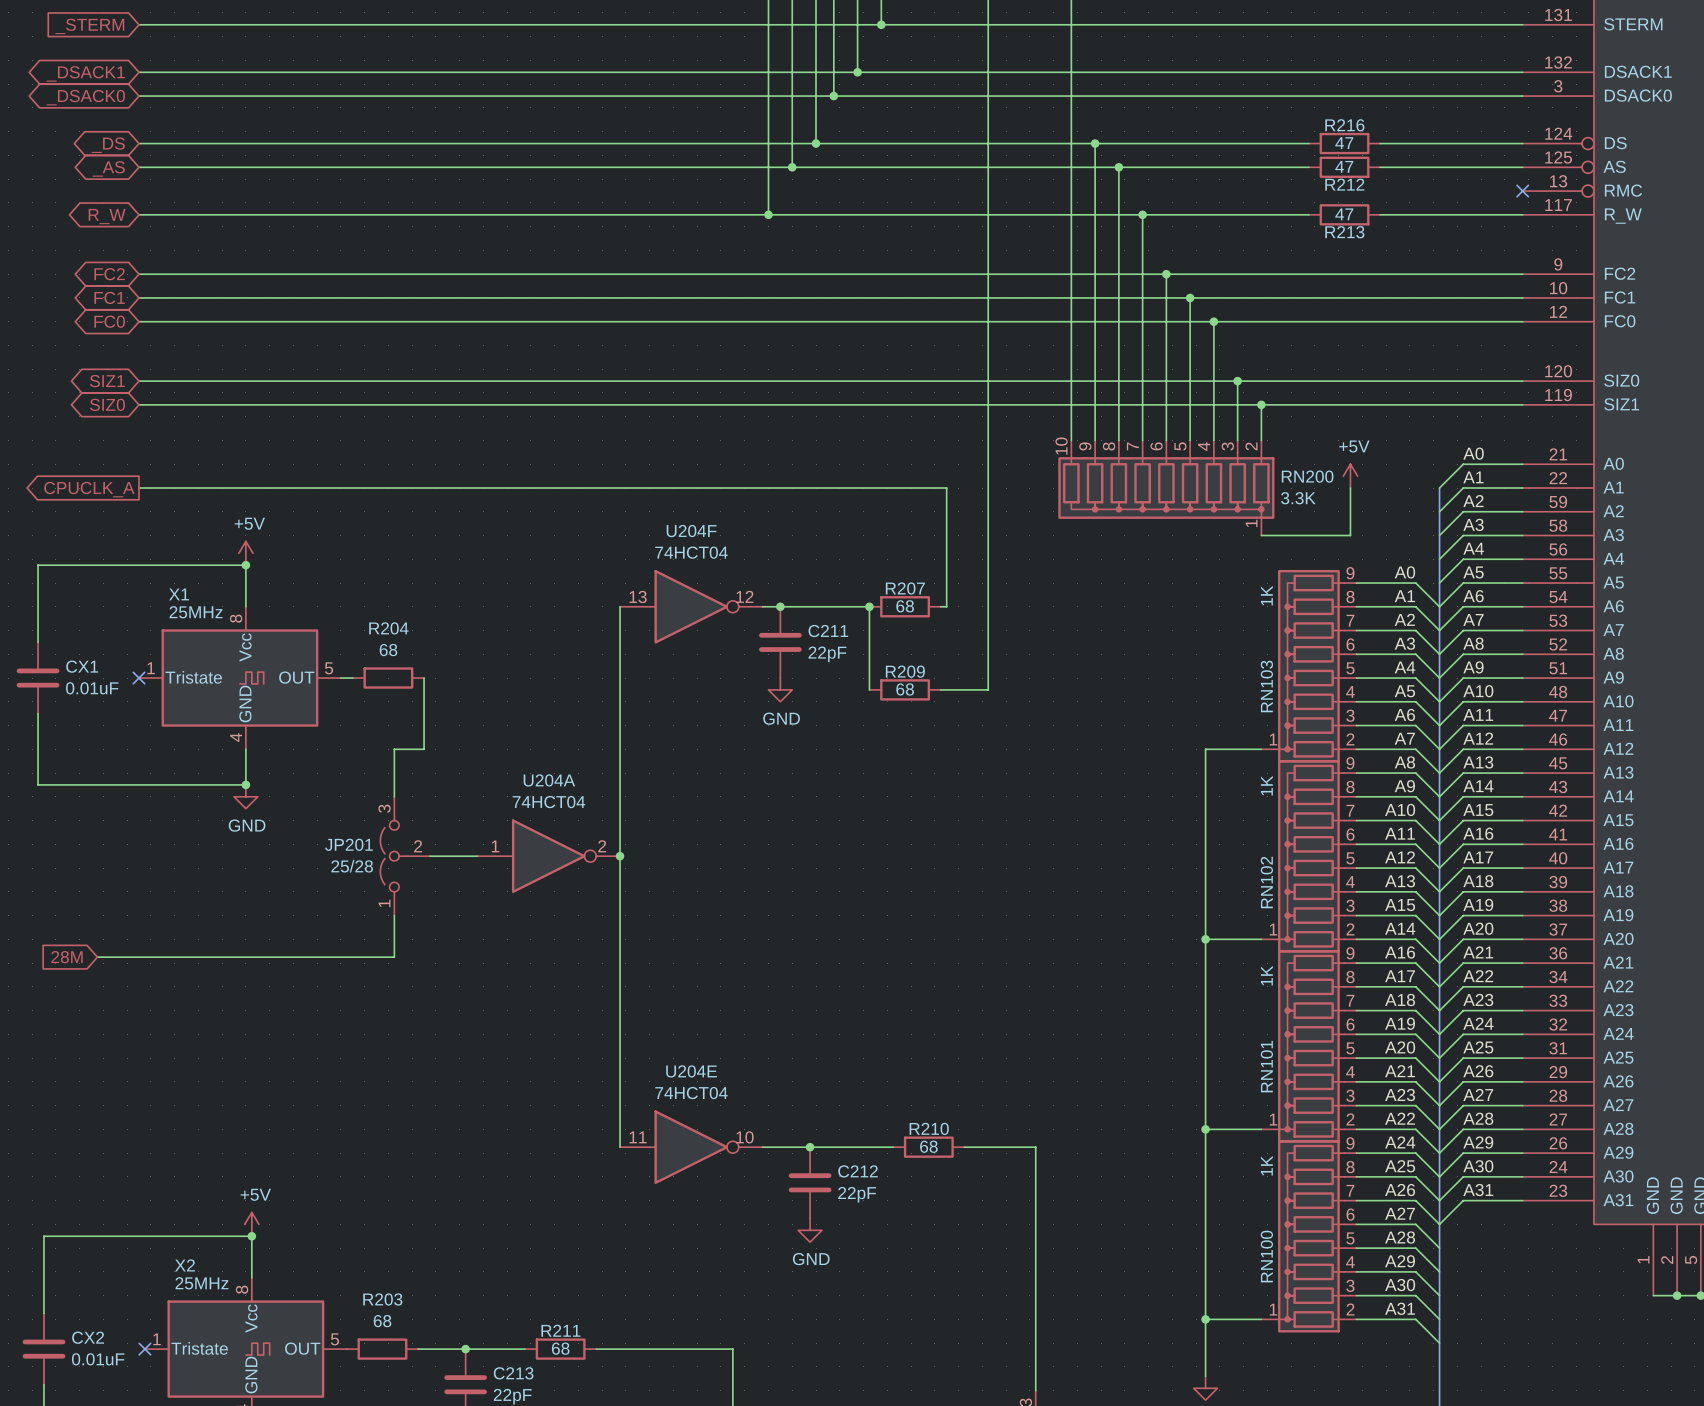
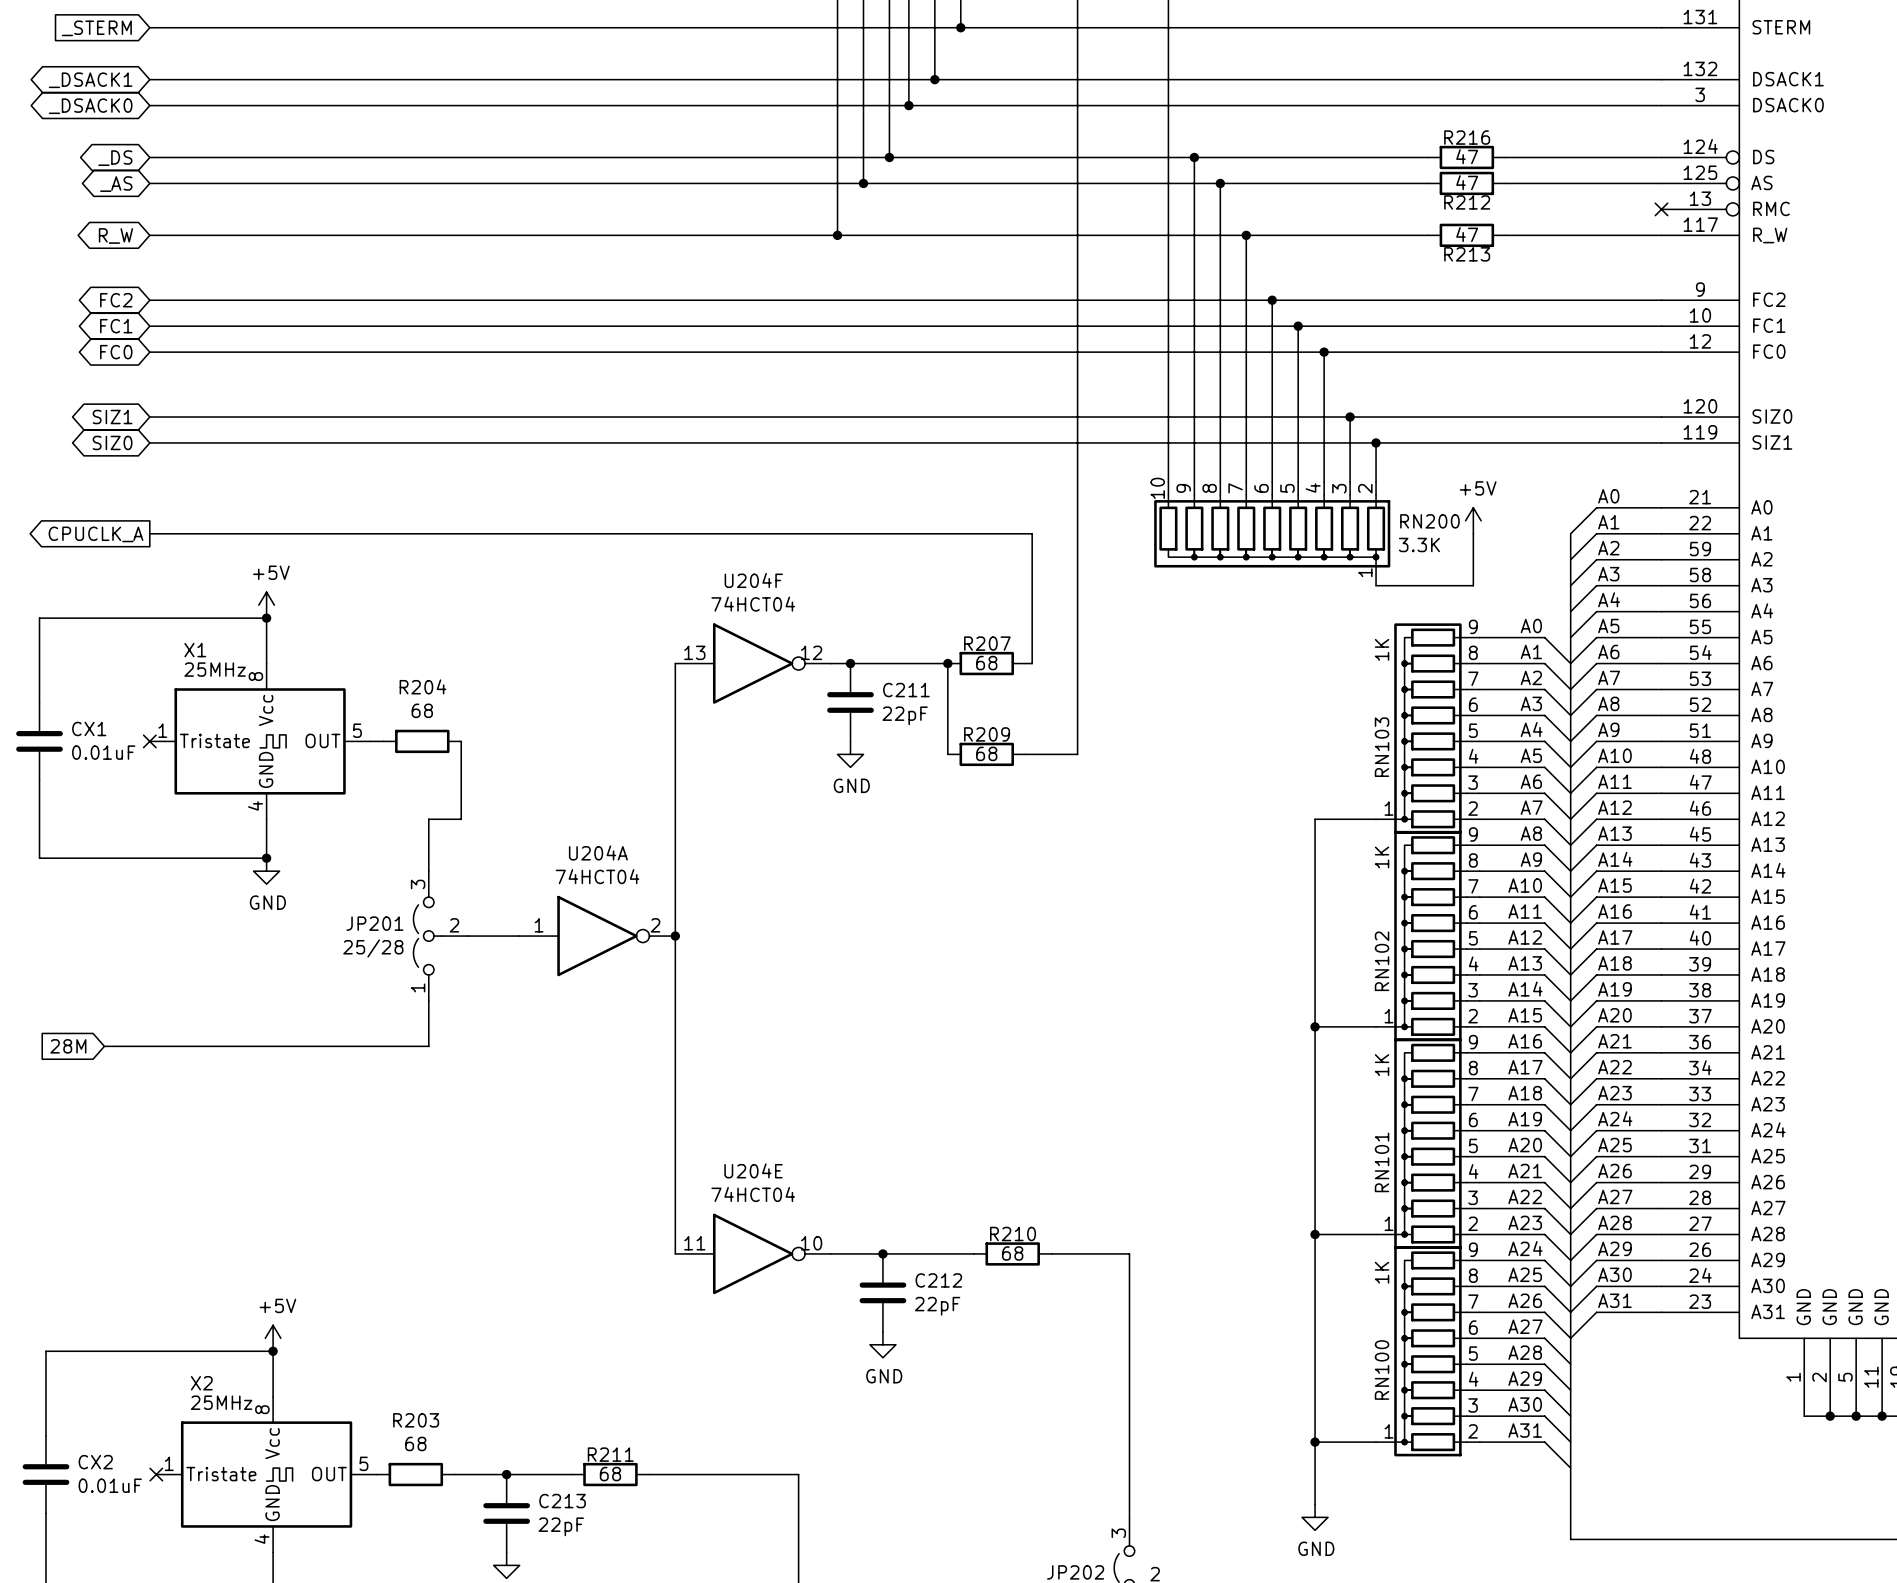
label: A15 (1400, 905) -> A14 (1525, 989)
label: A14 (1400, 928) -> A15 (1525, 1015)
label: A23 (1400, 1095) -> A22 (1525, 1196)
label: A22 (1400, 1118) -> A23 (1525, 1222)

